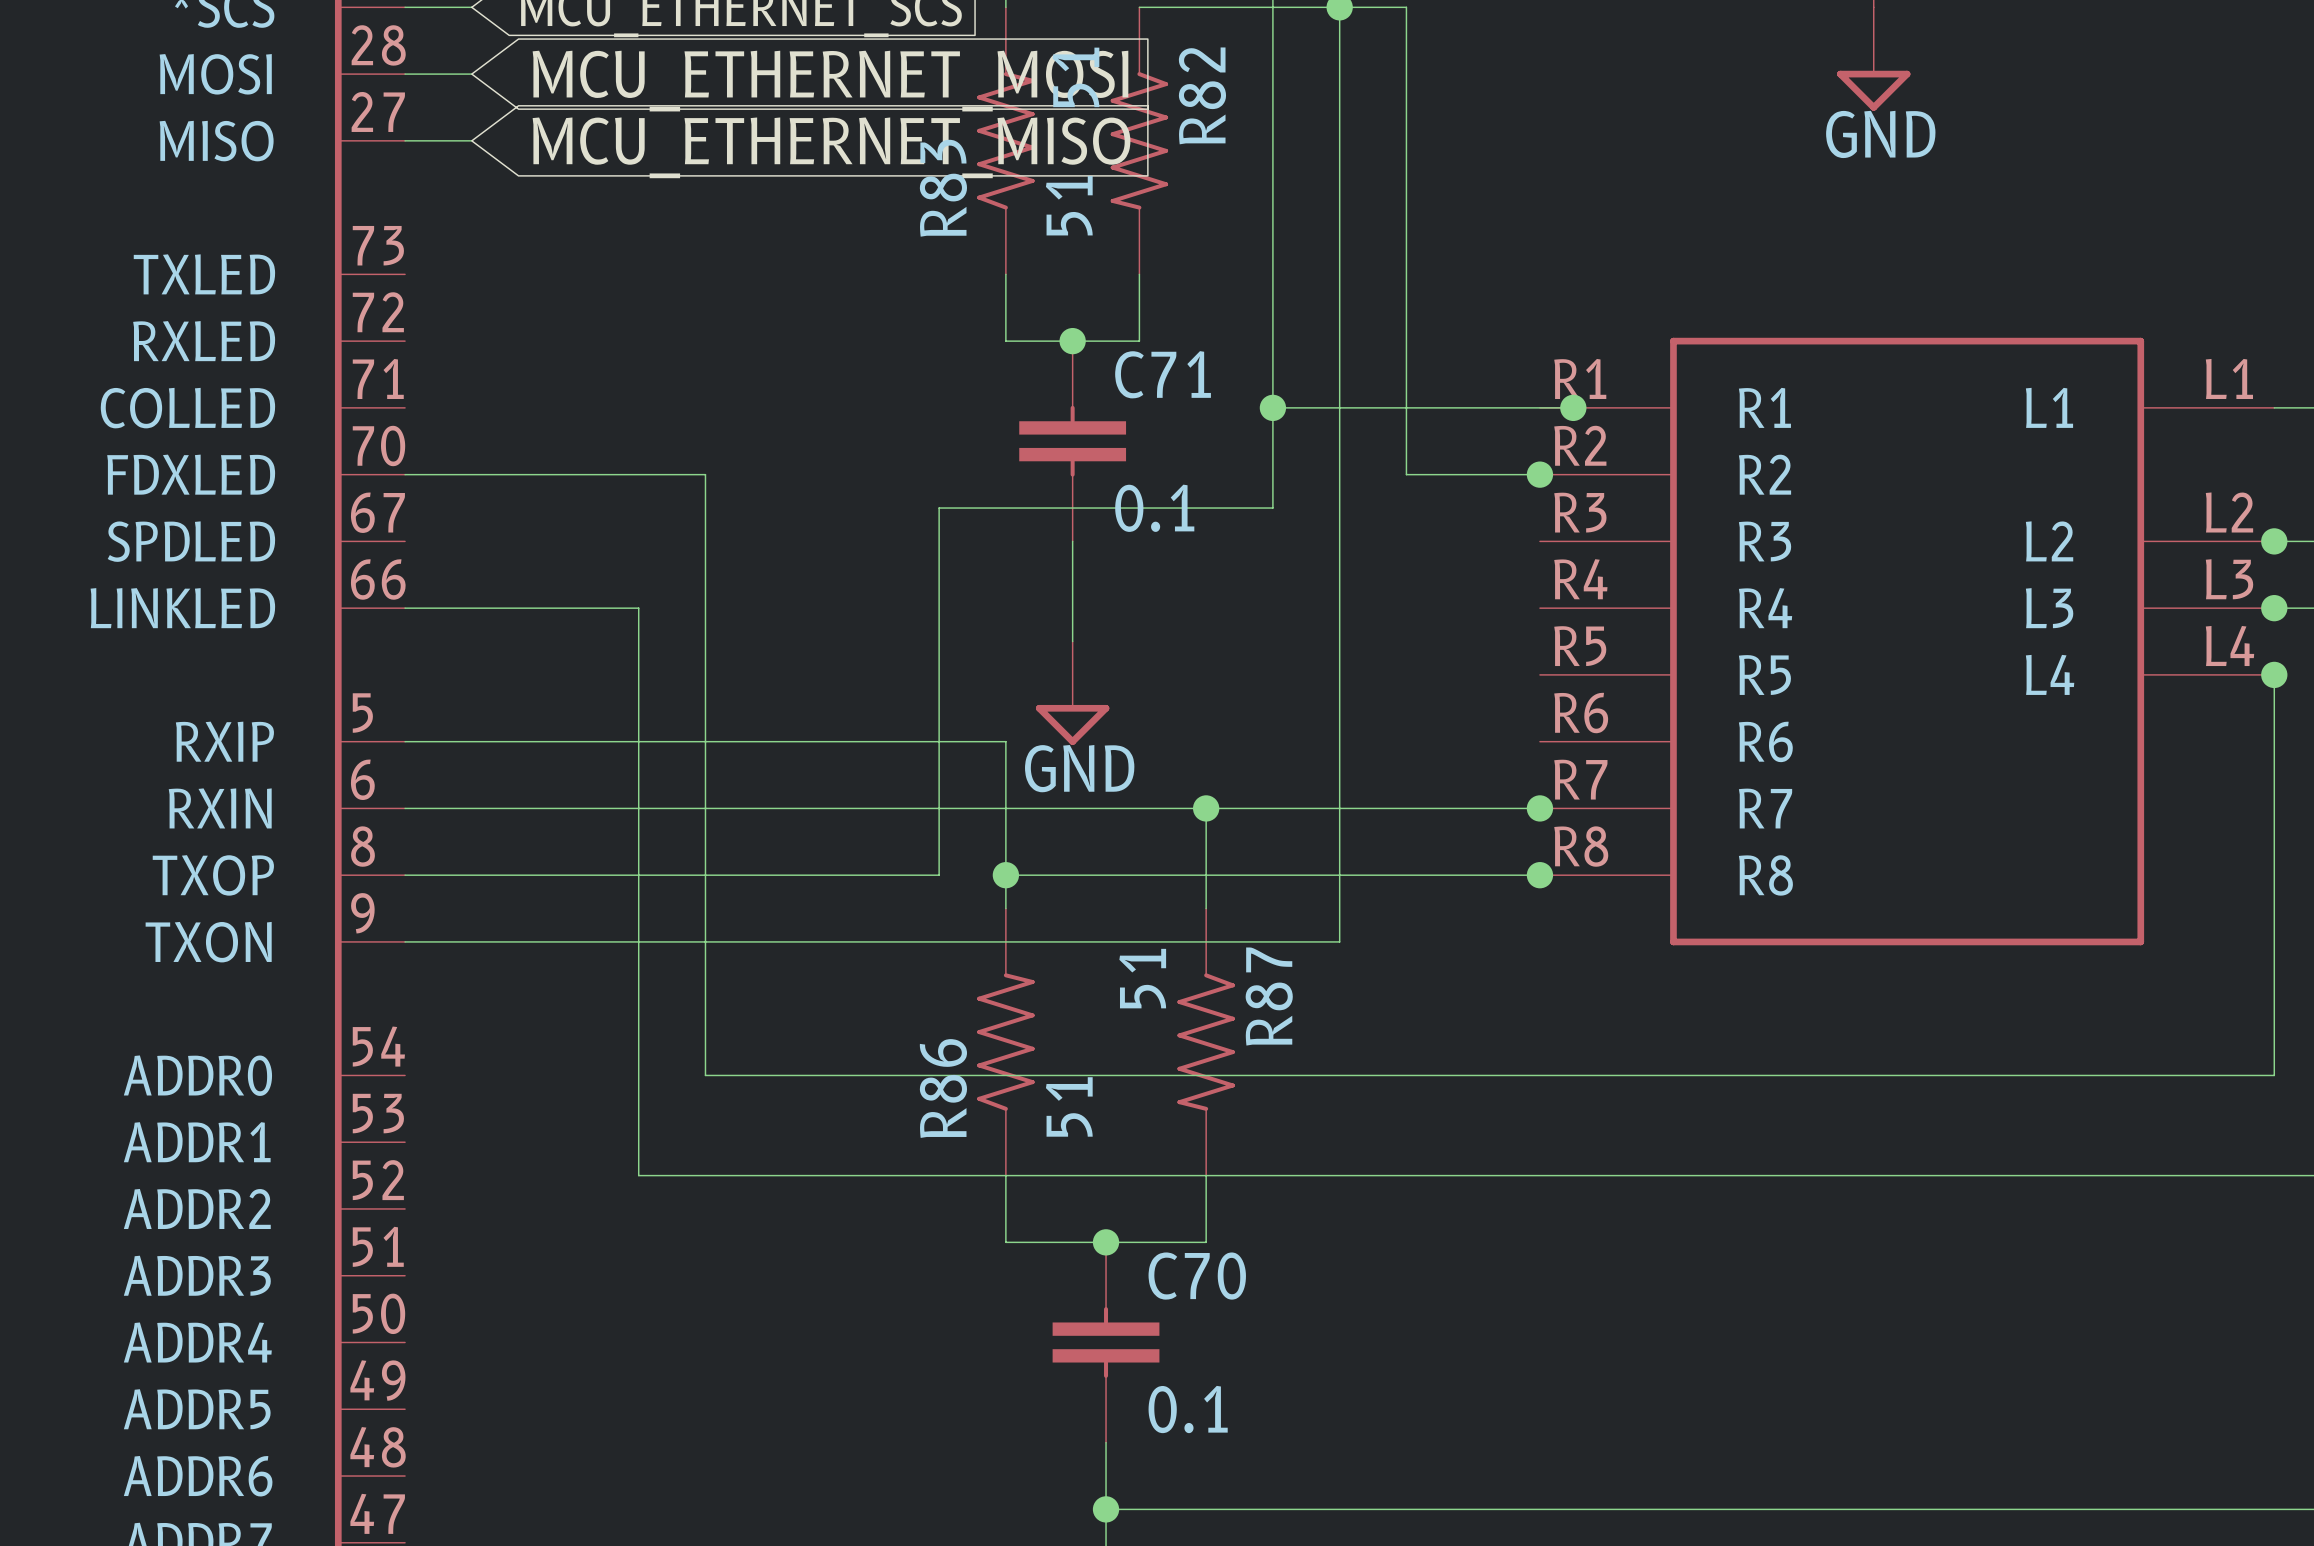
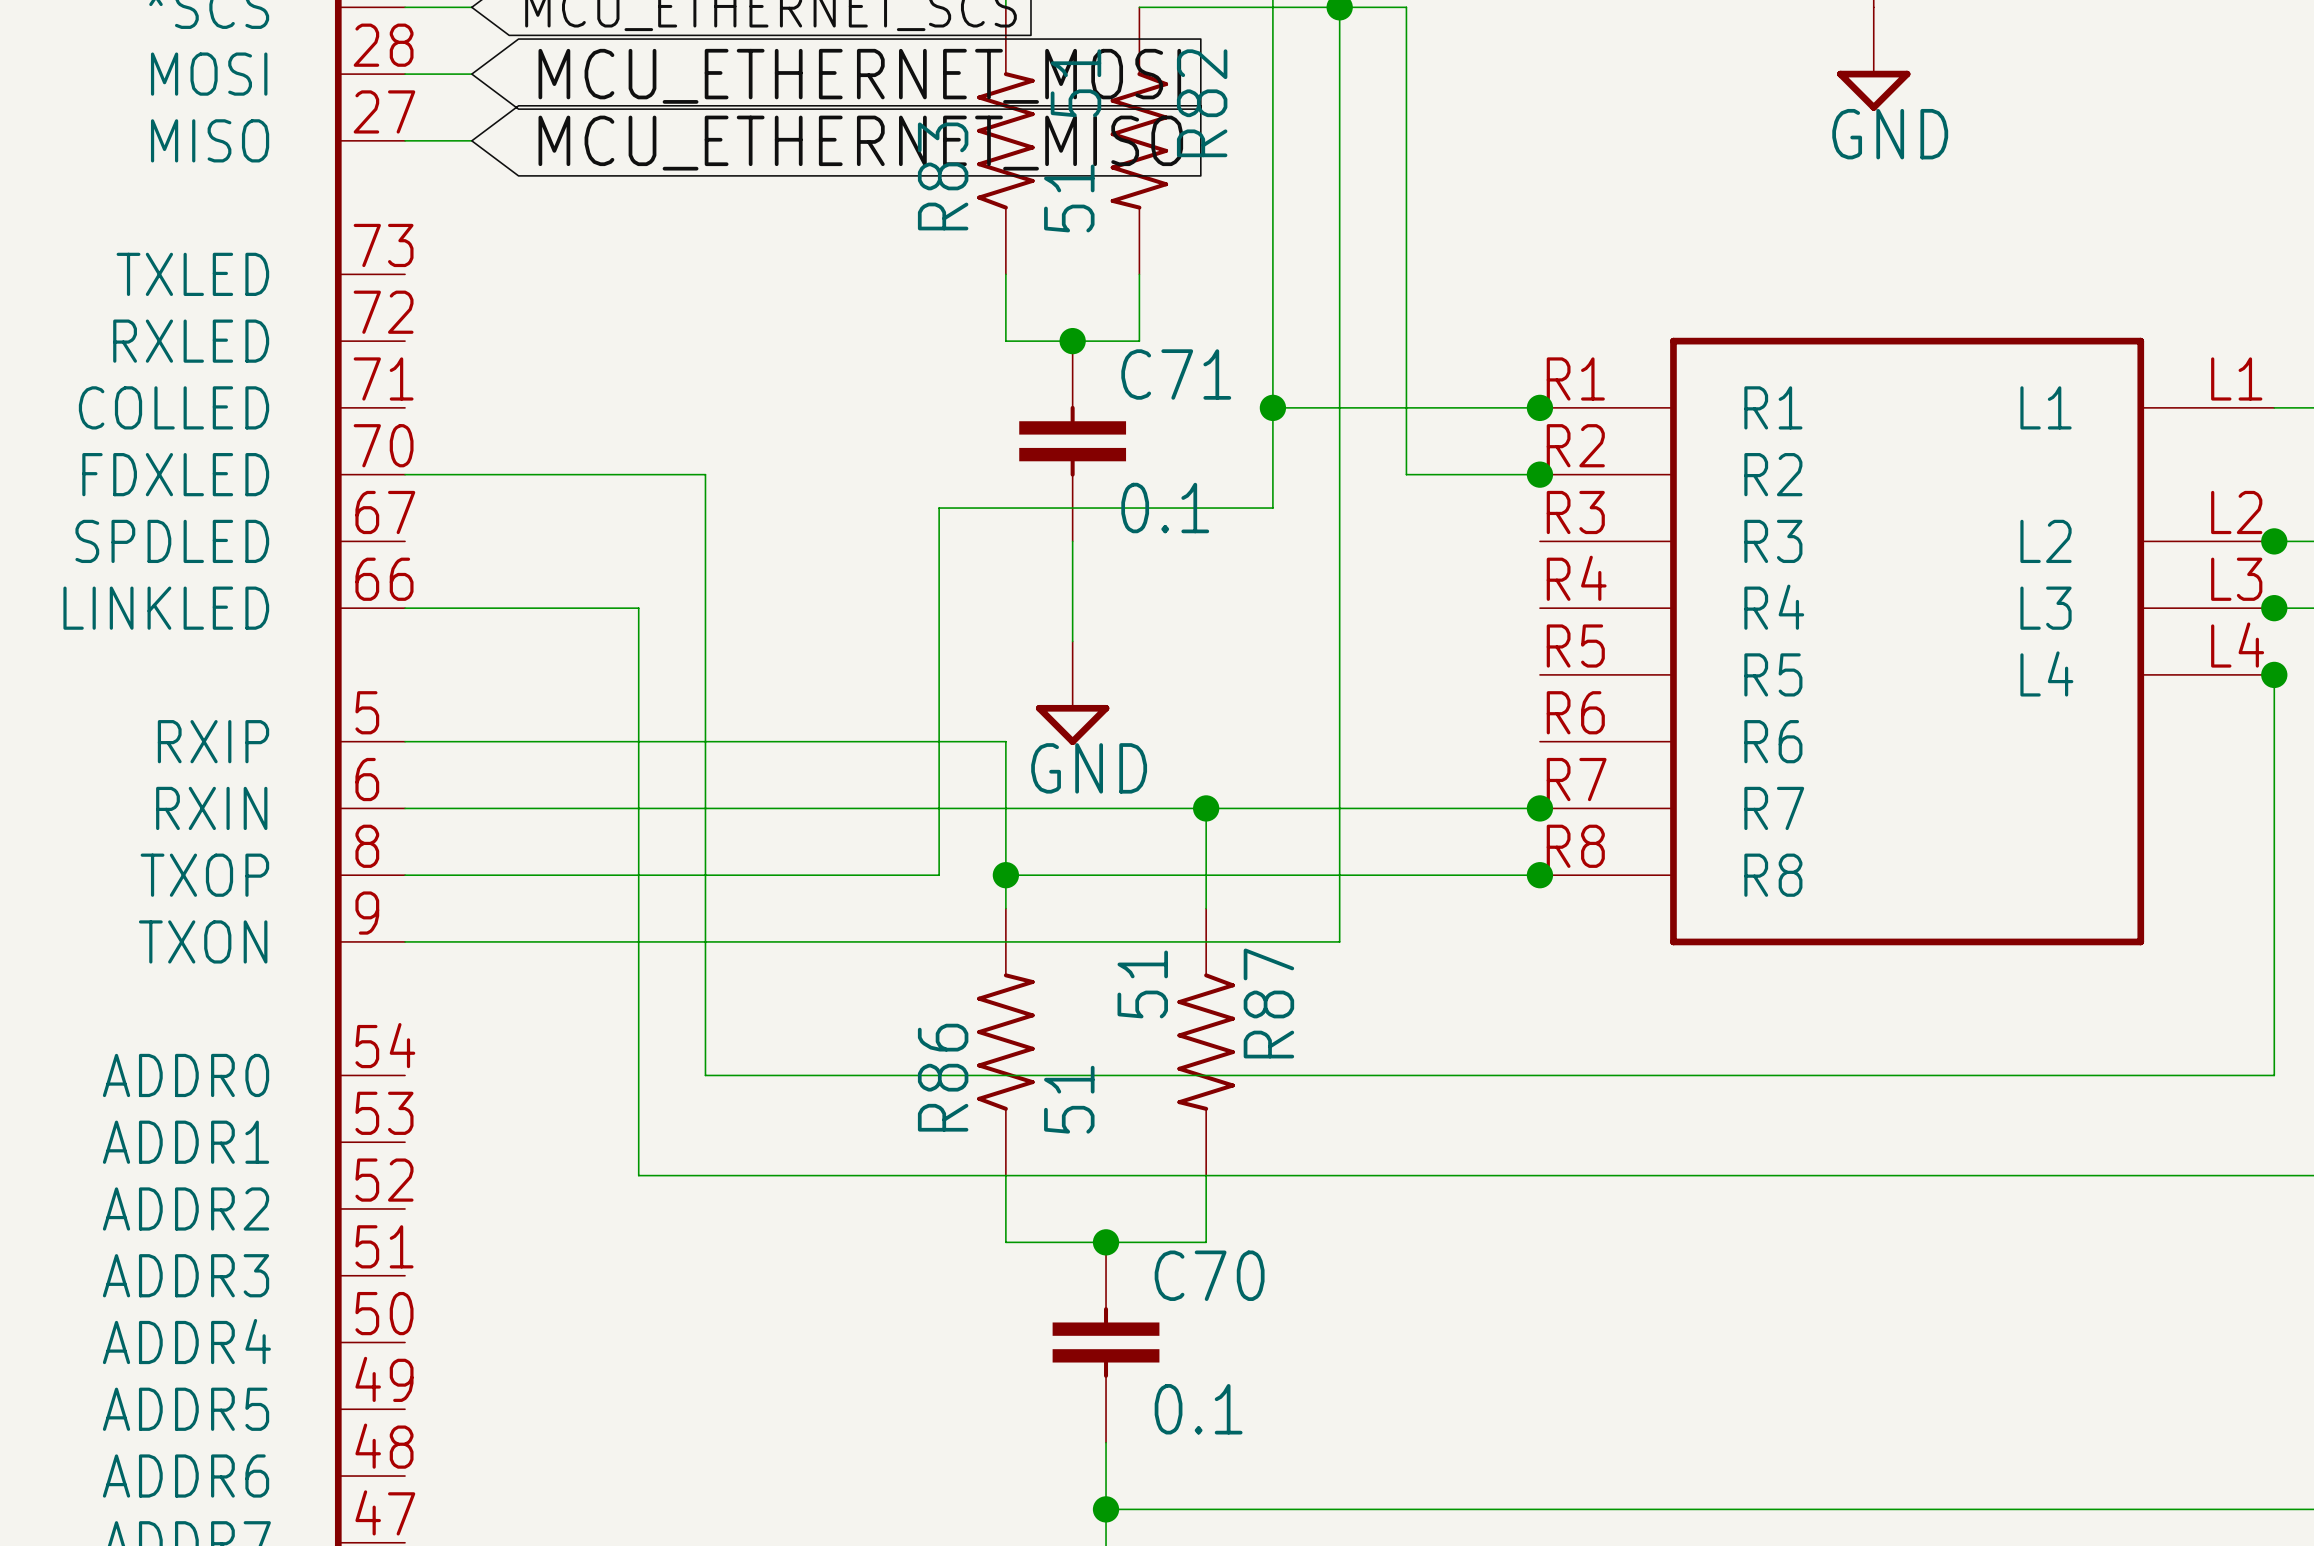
junction position: (1573, 407) -> (1539, 407)

